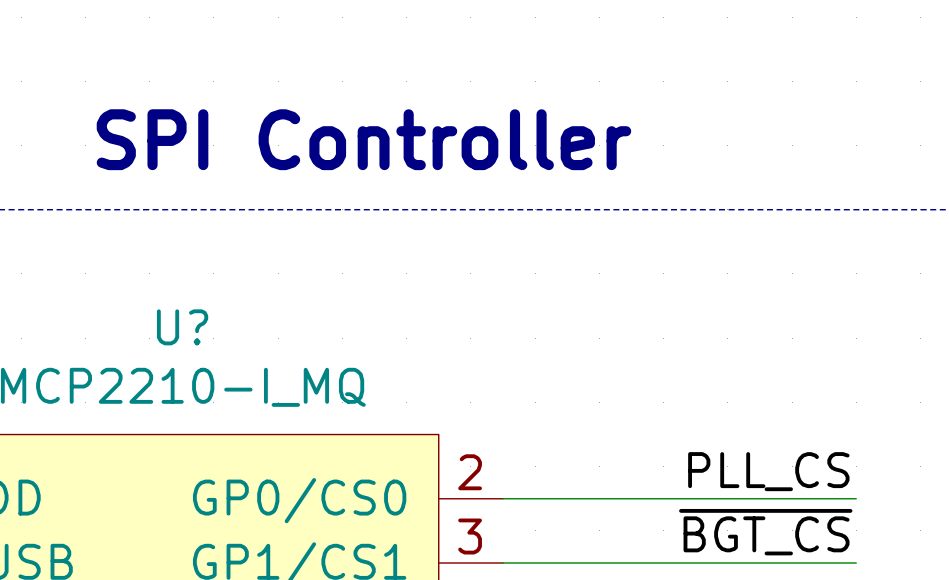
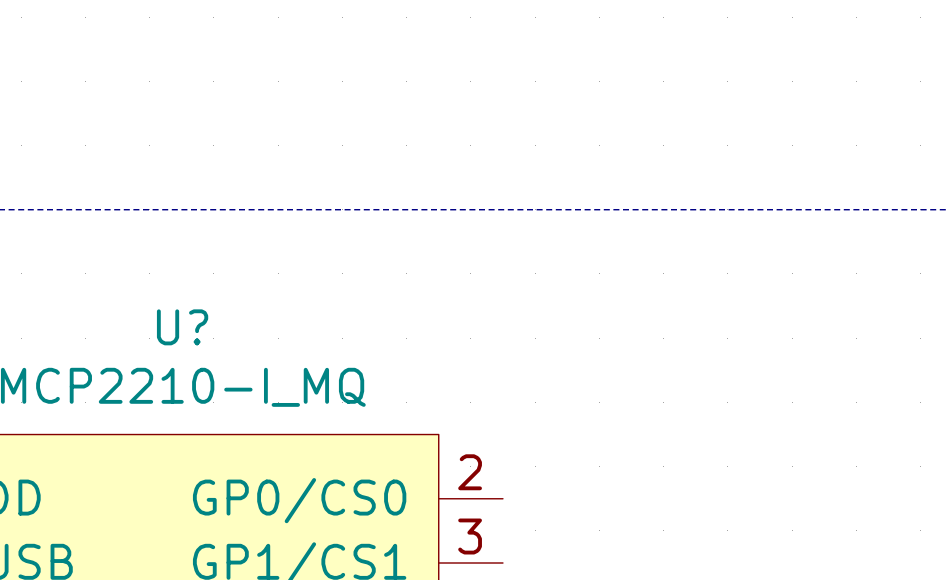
text: SPI Controller (363, 139) -> none
label: PLL_CS (768, 471) -> none
wire: (502, 498) (856, 498) -> none
label: ~{BGT_CS} (765, 532) -> none
wire: (502, 563) (856, 563) -> none

